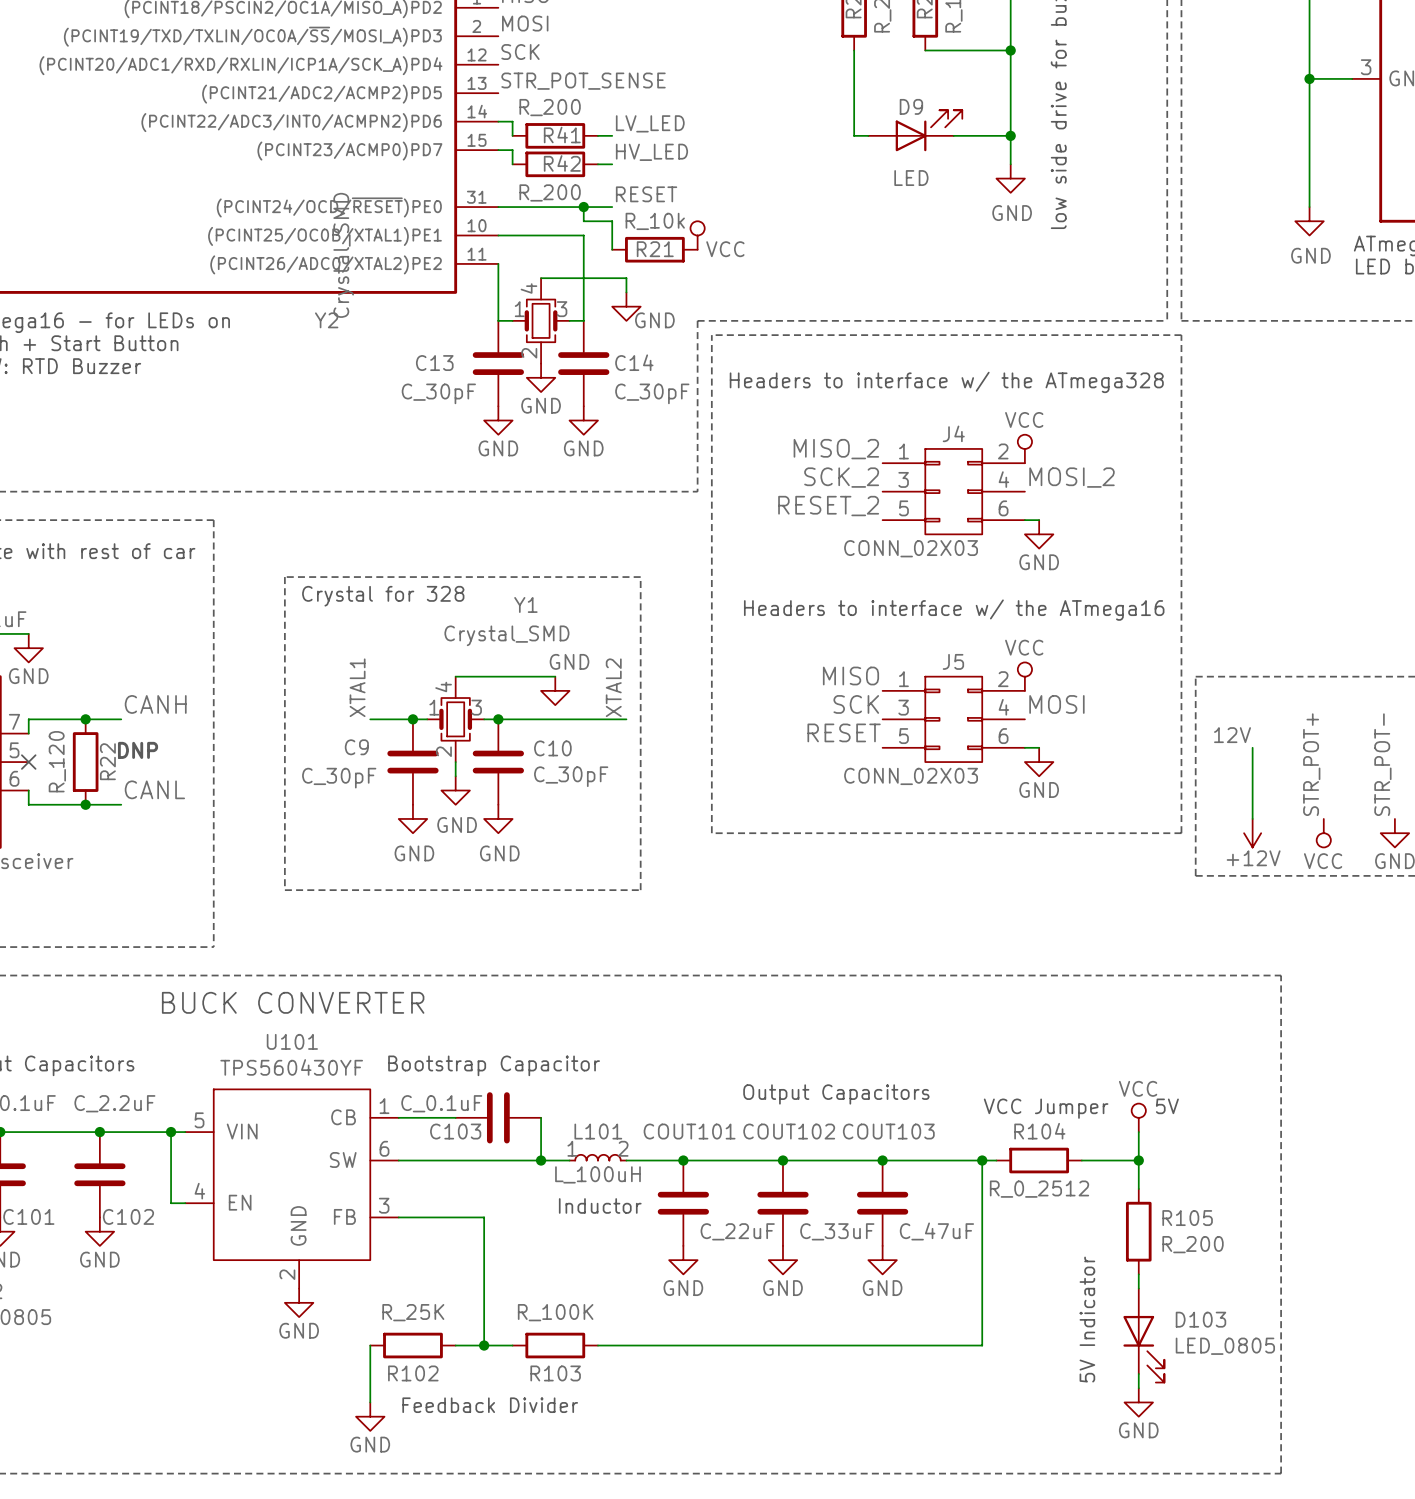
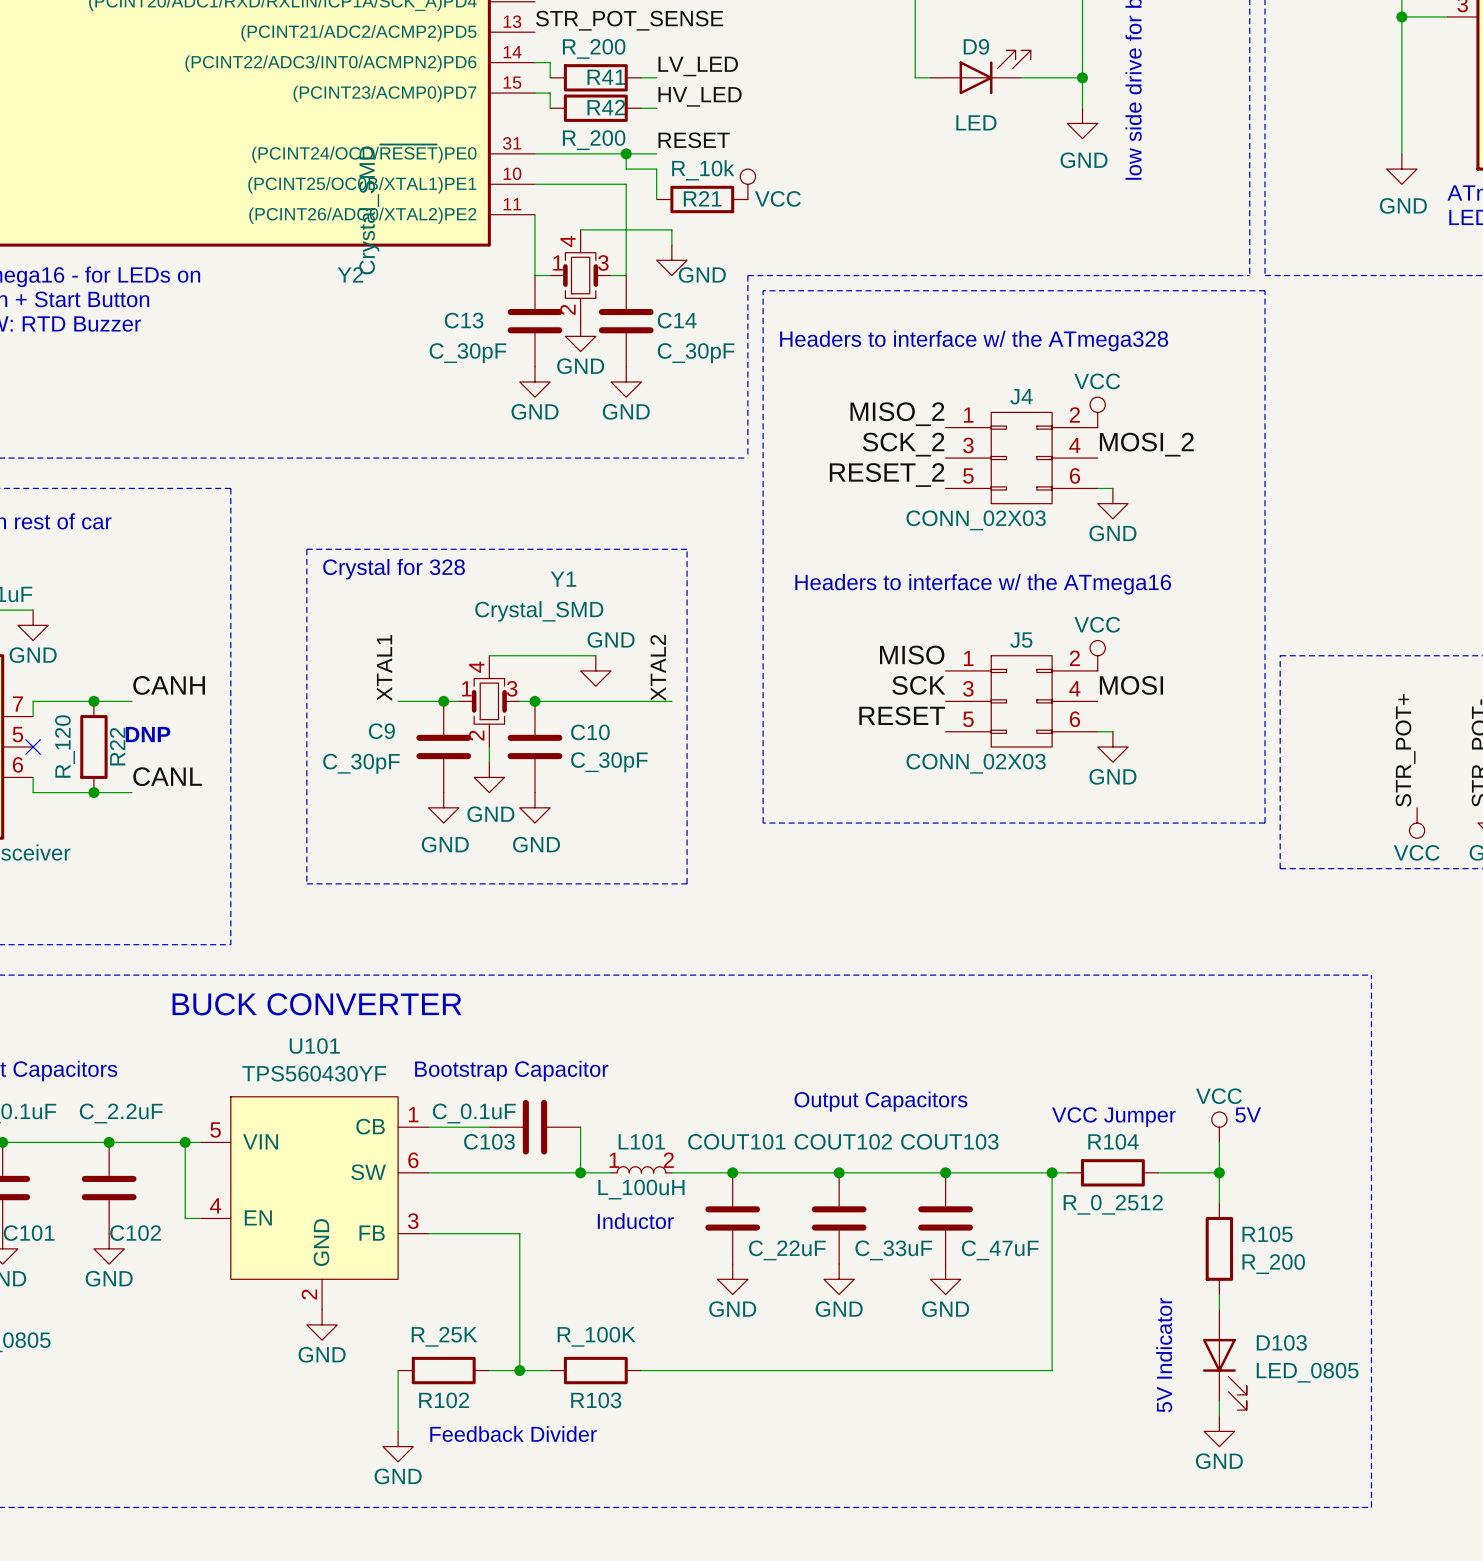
label: 12V (1232, 735) -> none
wire: (1252, 747) (1252, 818) -> none
power symbol: +12V (1252, 833) -> none

